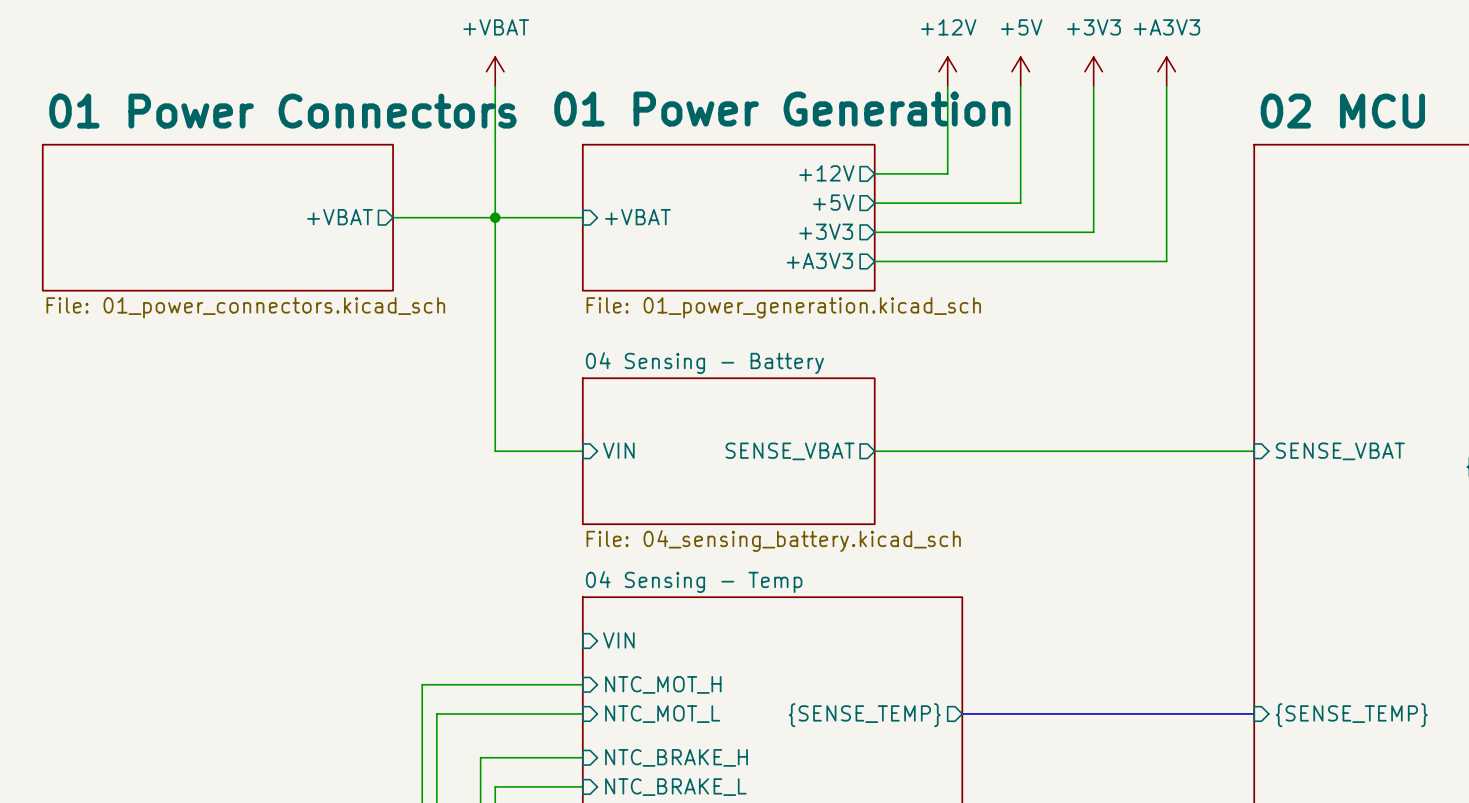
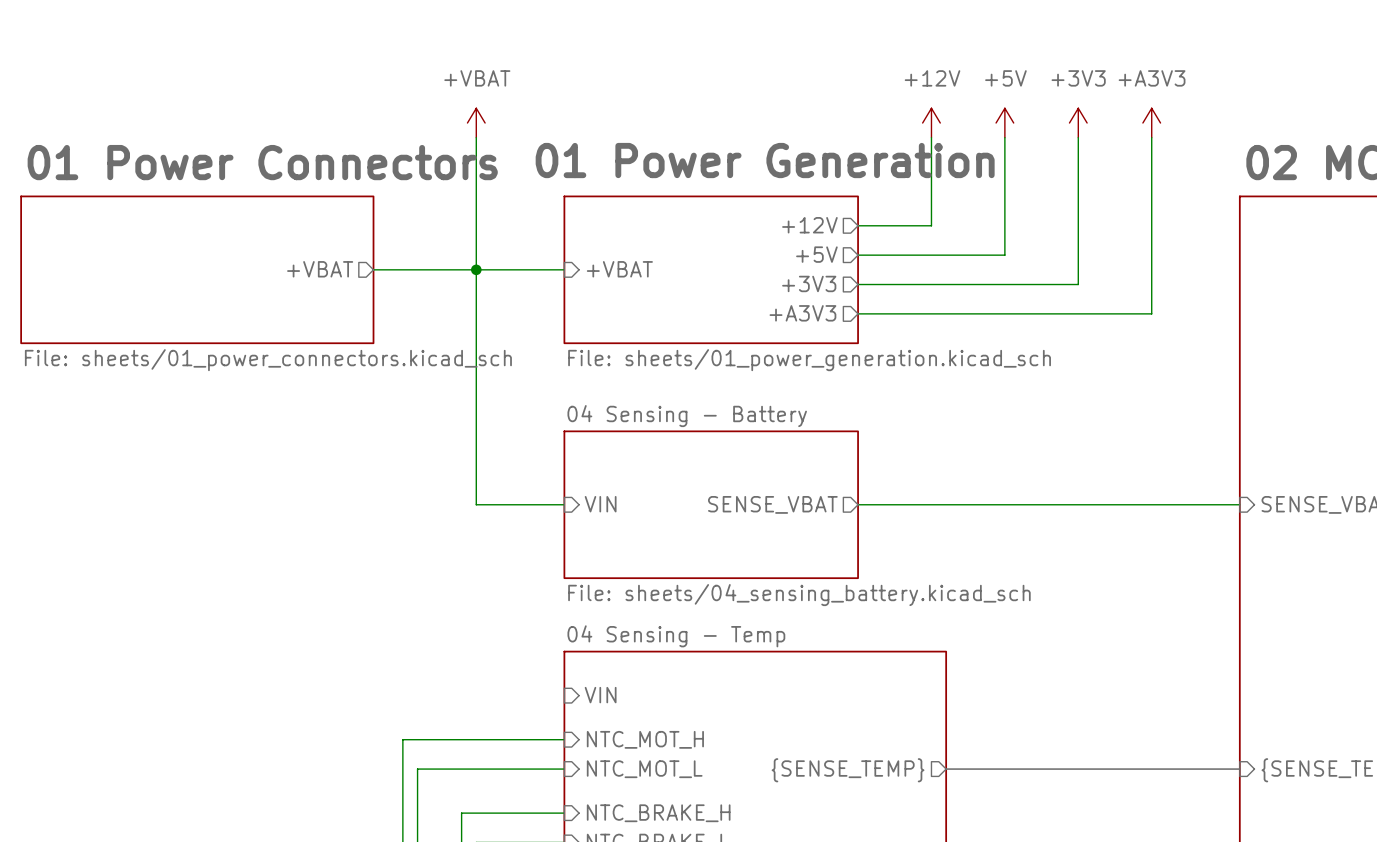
sheet 01 Power Connectors value: File: 01_power_connectors.kicad_sch (245, 307) -> File: sheets/01_power_connectors.kicad_sch (268, 360)
sheet 01 Power Generation value: File: 01_power_generation.kicad_sch (783, 307) -> File: sheets/01_power_generation.kicad_sch (809, 360)
sheet 04 Sensing - Battery value: File: 04_sensing_battery.kicad_sch (773, 541) -> File: sheets/04_sensing_battery.kicad_sch (799, 595)

